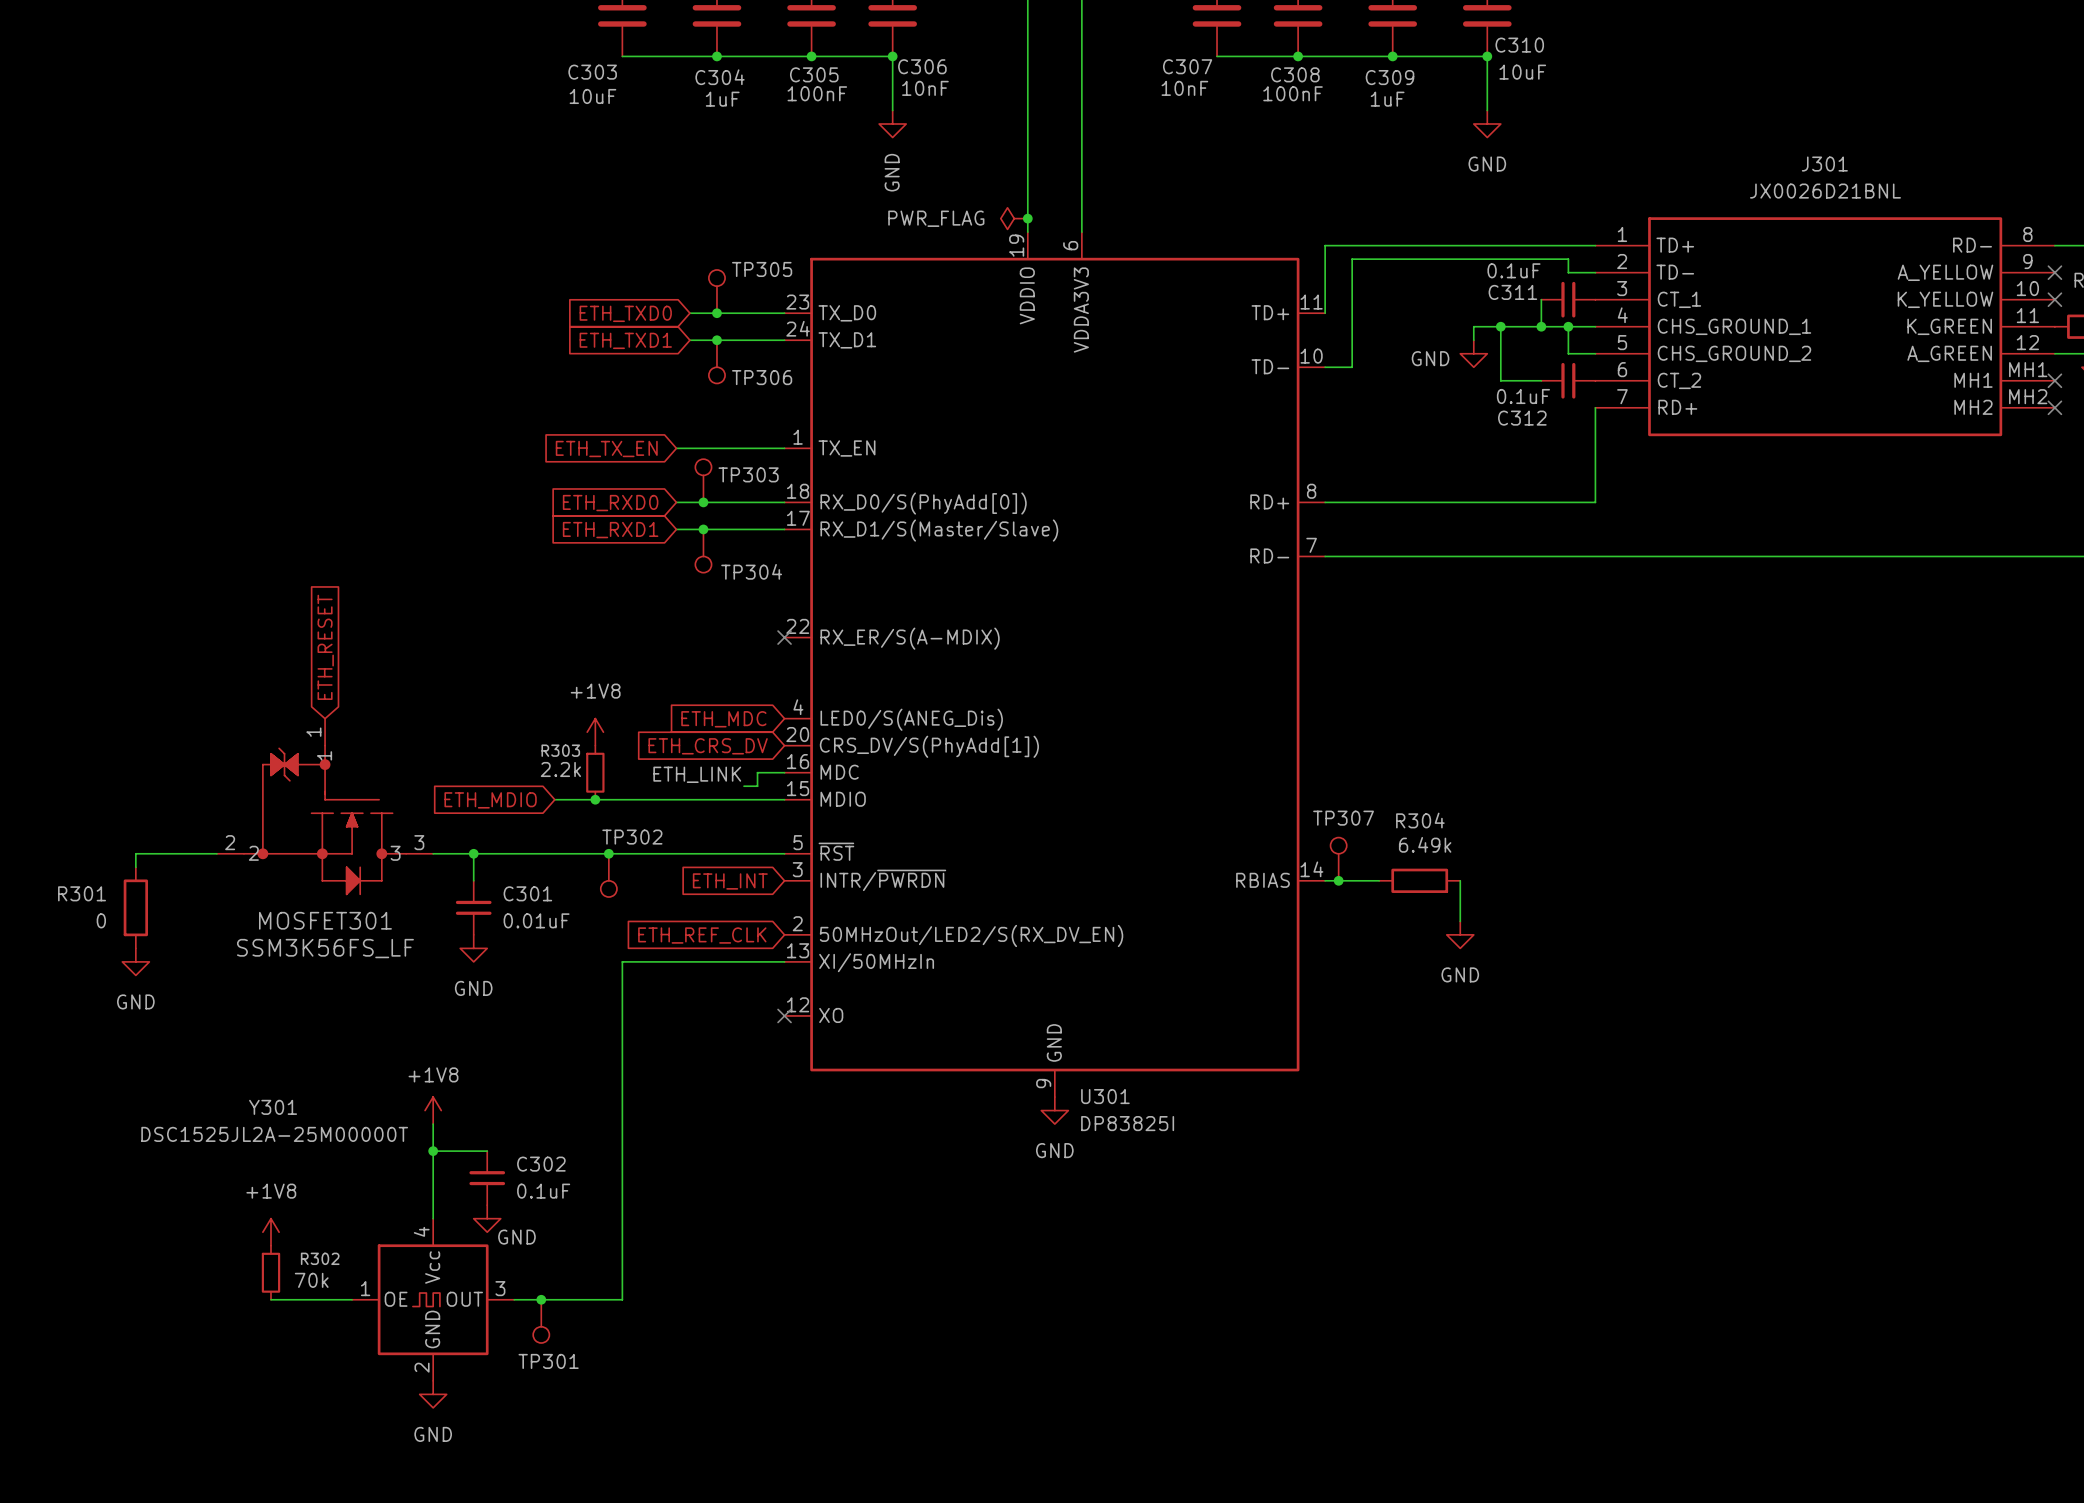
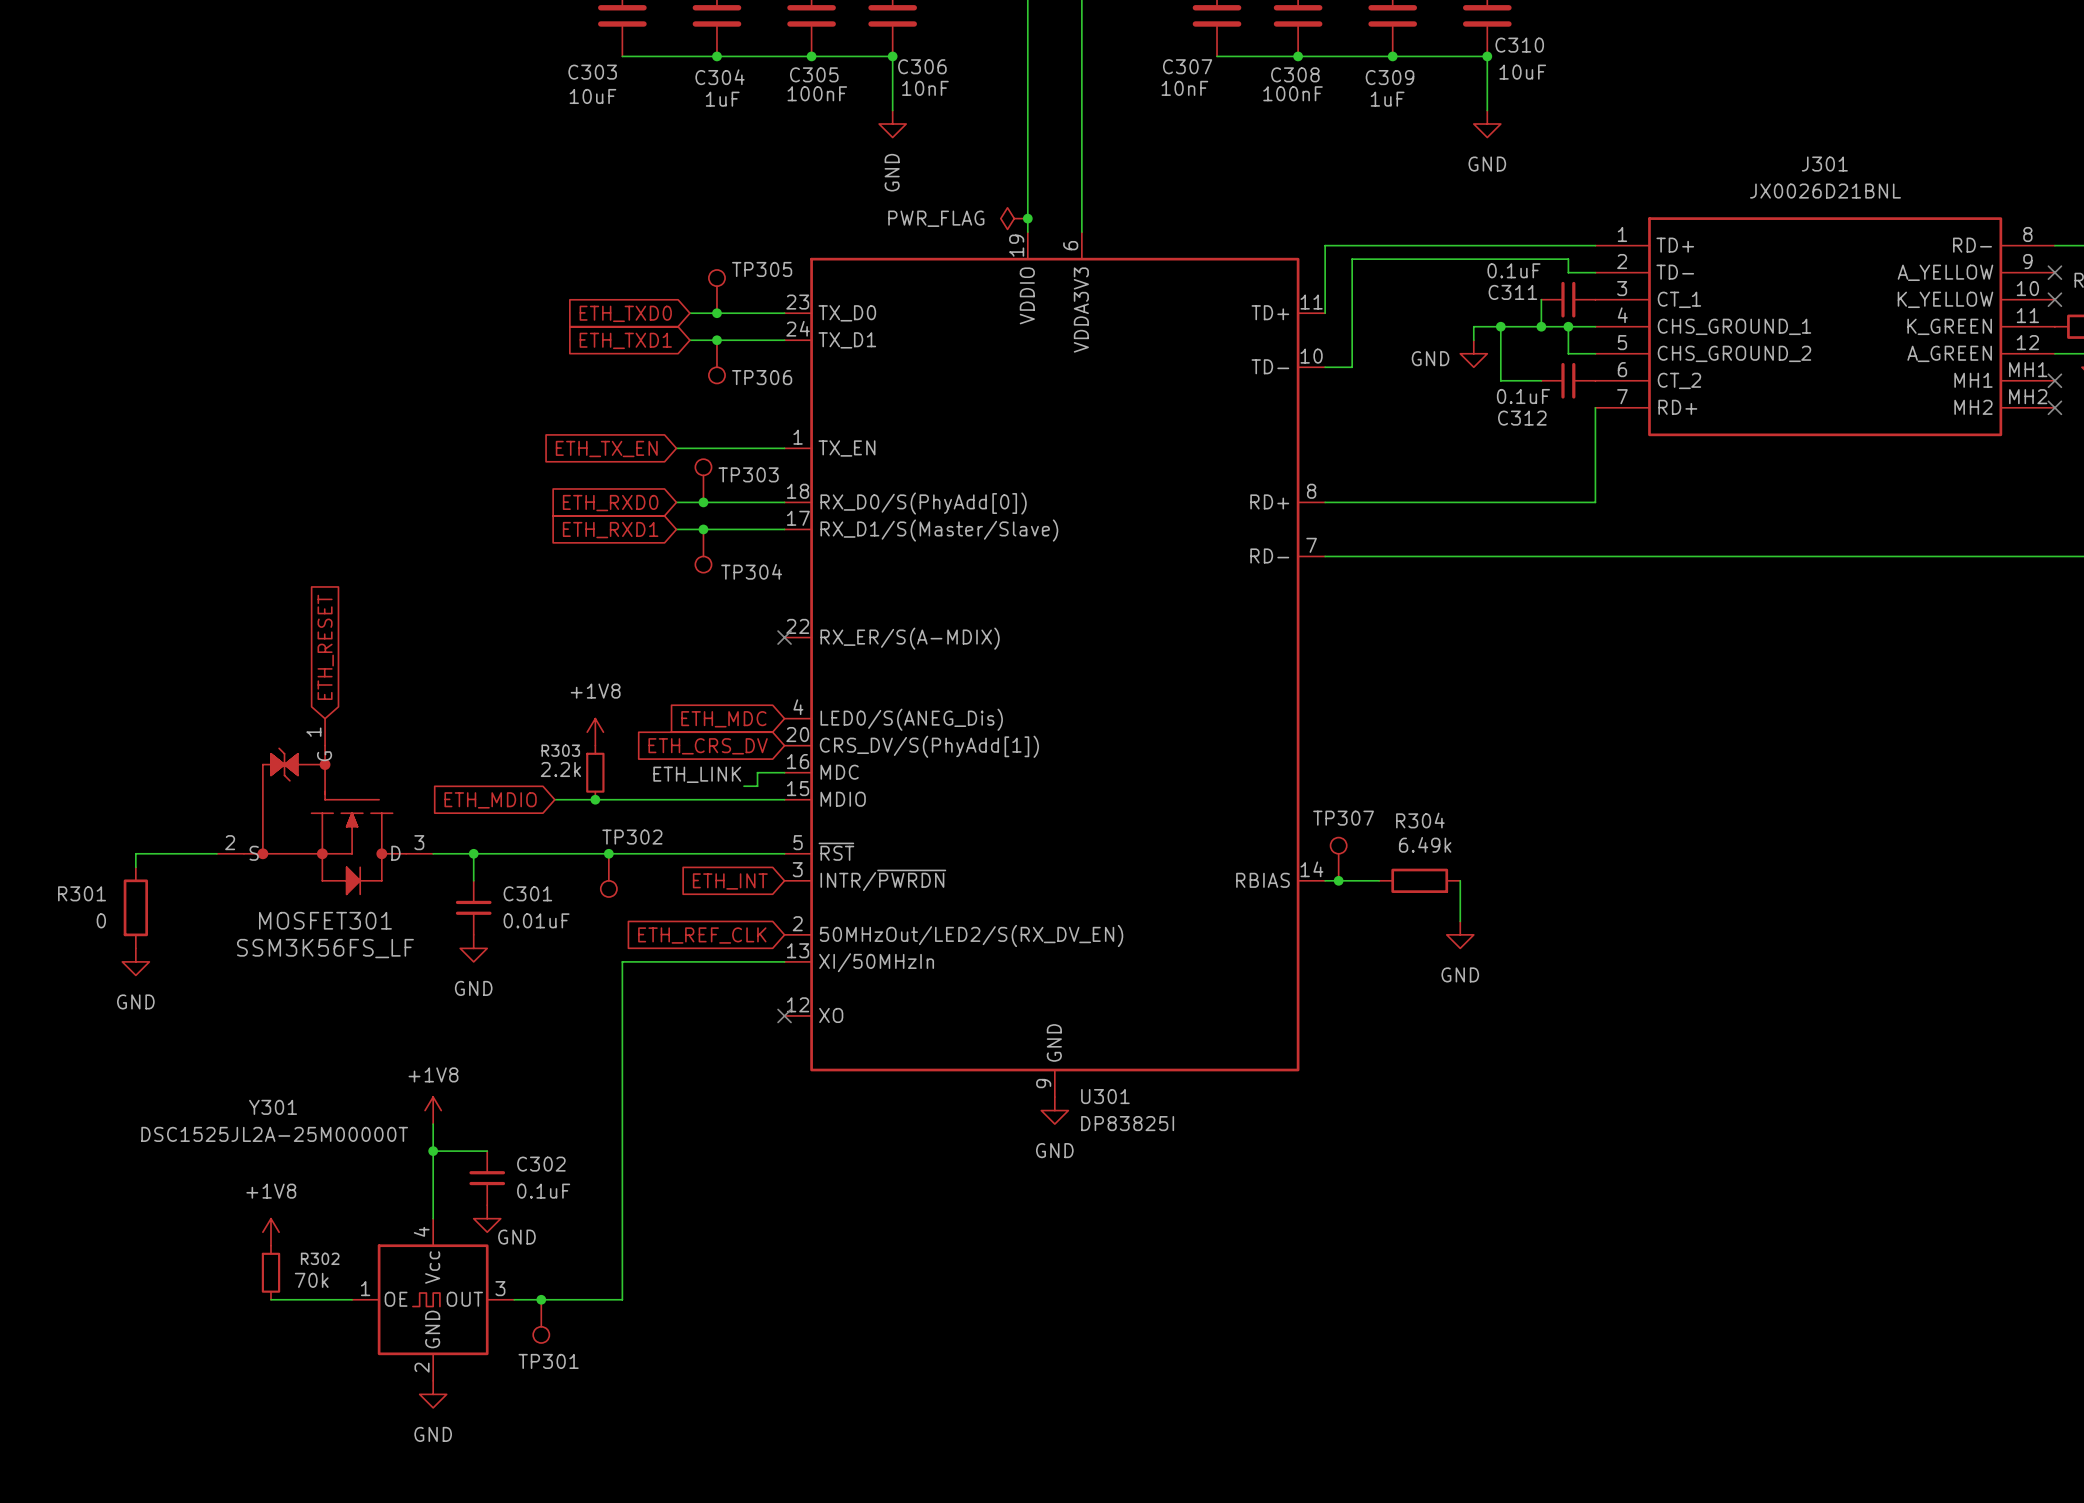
MOSFET301 pin name: 1 (324, 755) -> G (324, 756)
MOSFET301 pin name: 2 (253, 853) -> S (254, 853)
MOSFET301 pin name: 3 (395, 853) -> D (395, 853)

